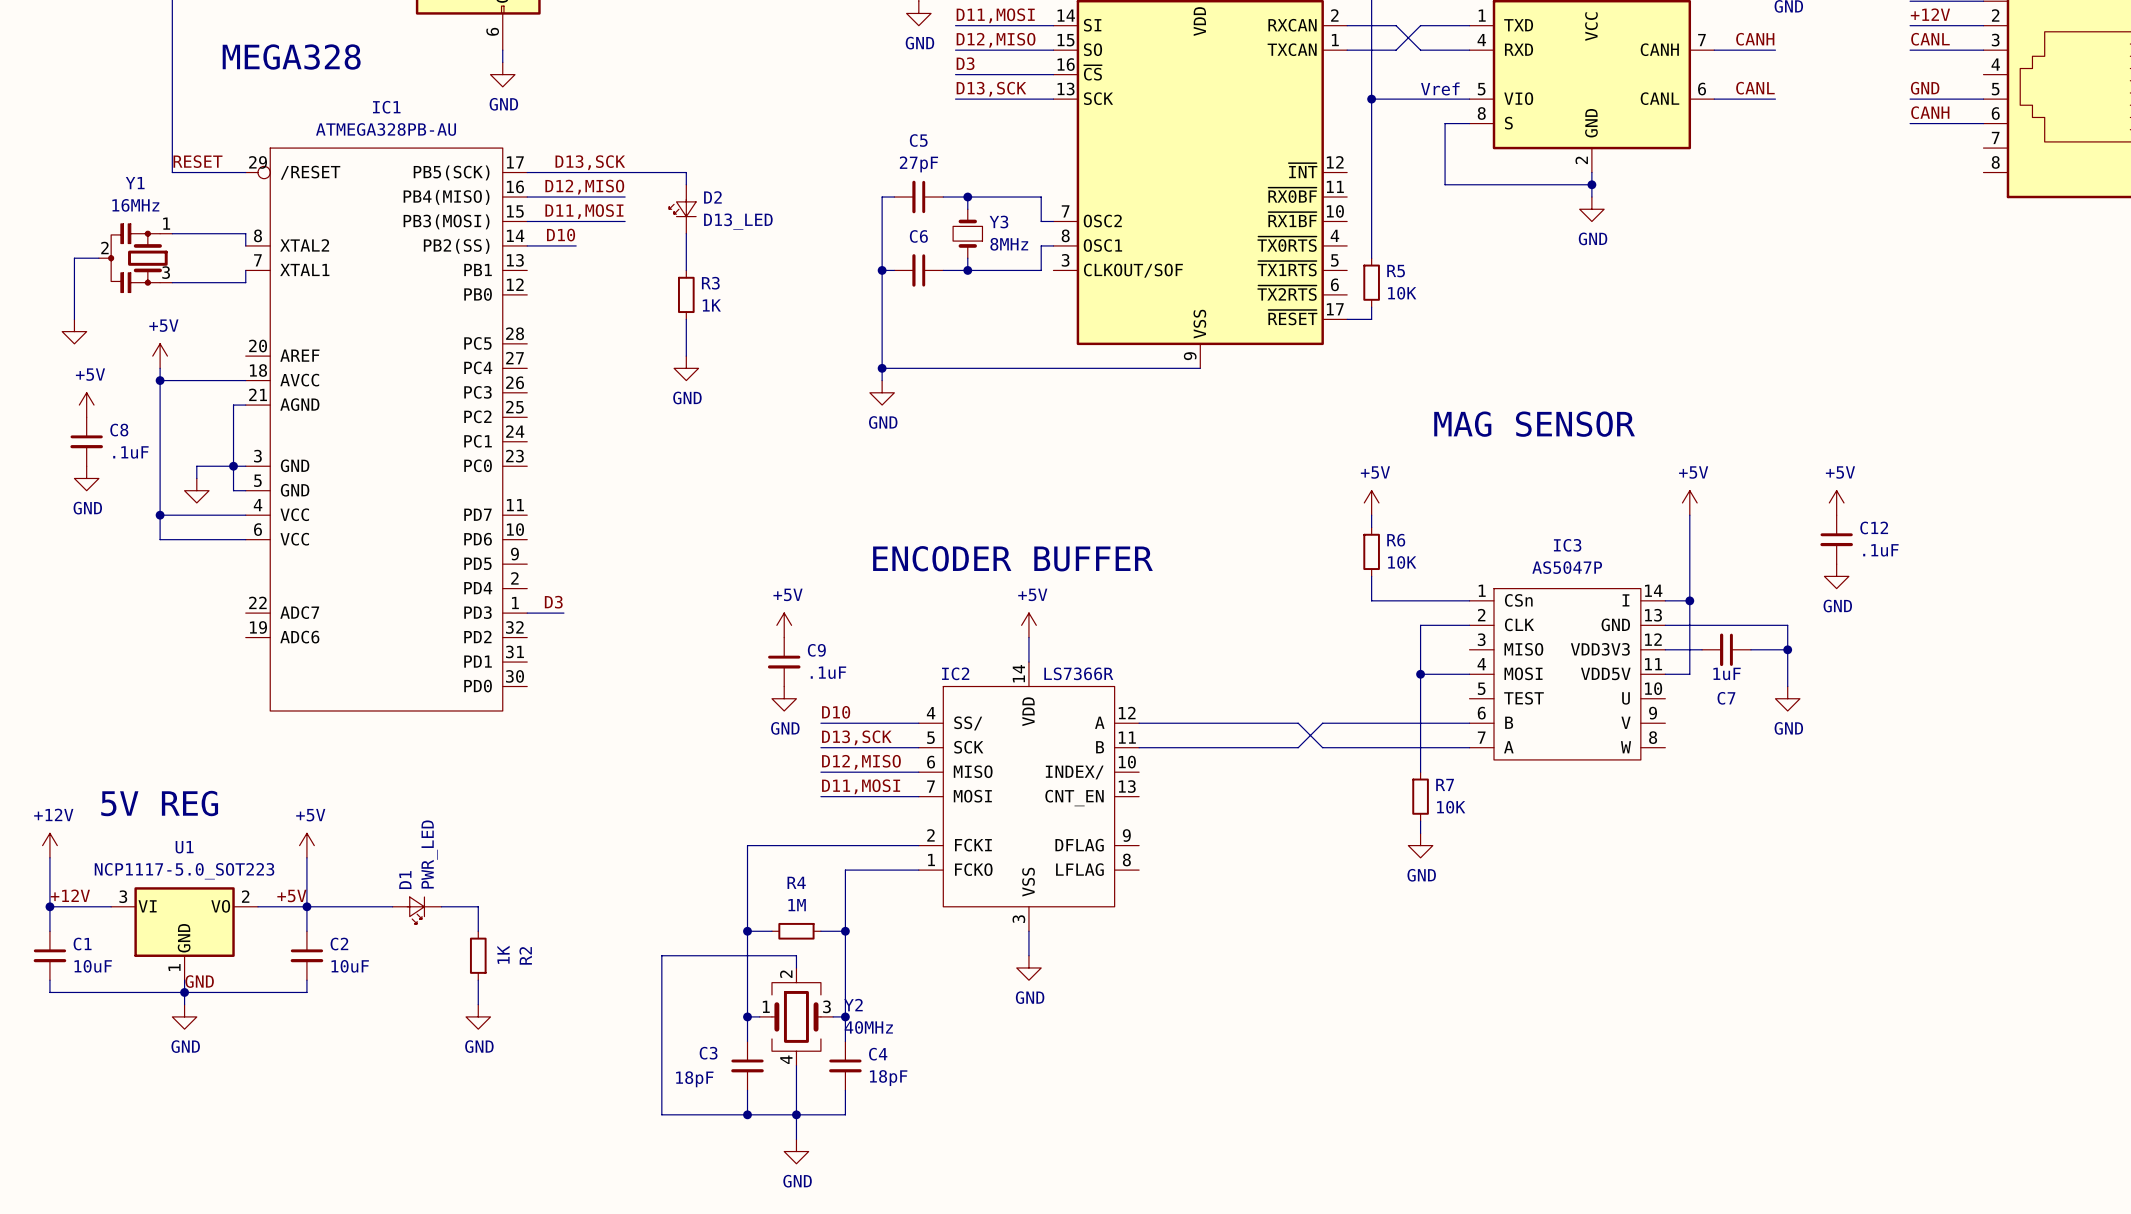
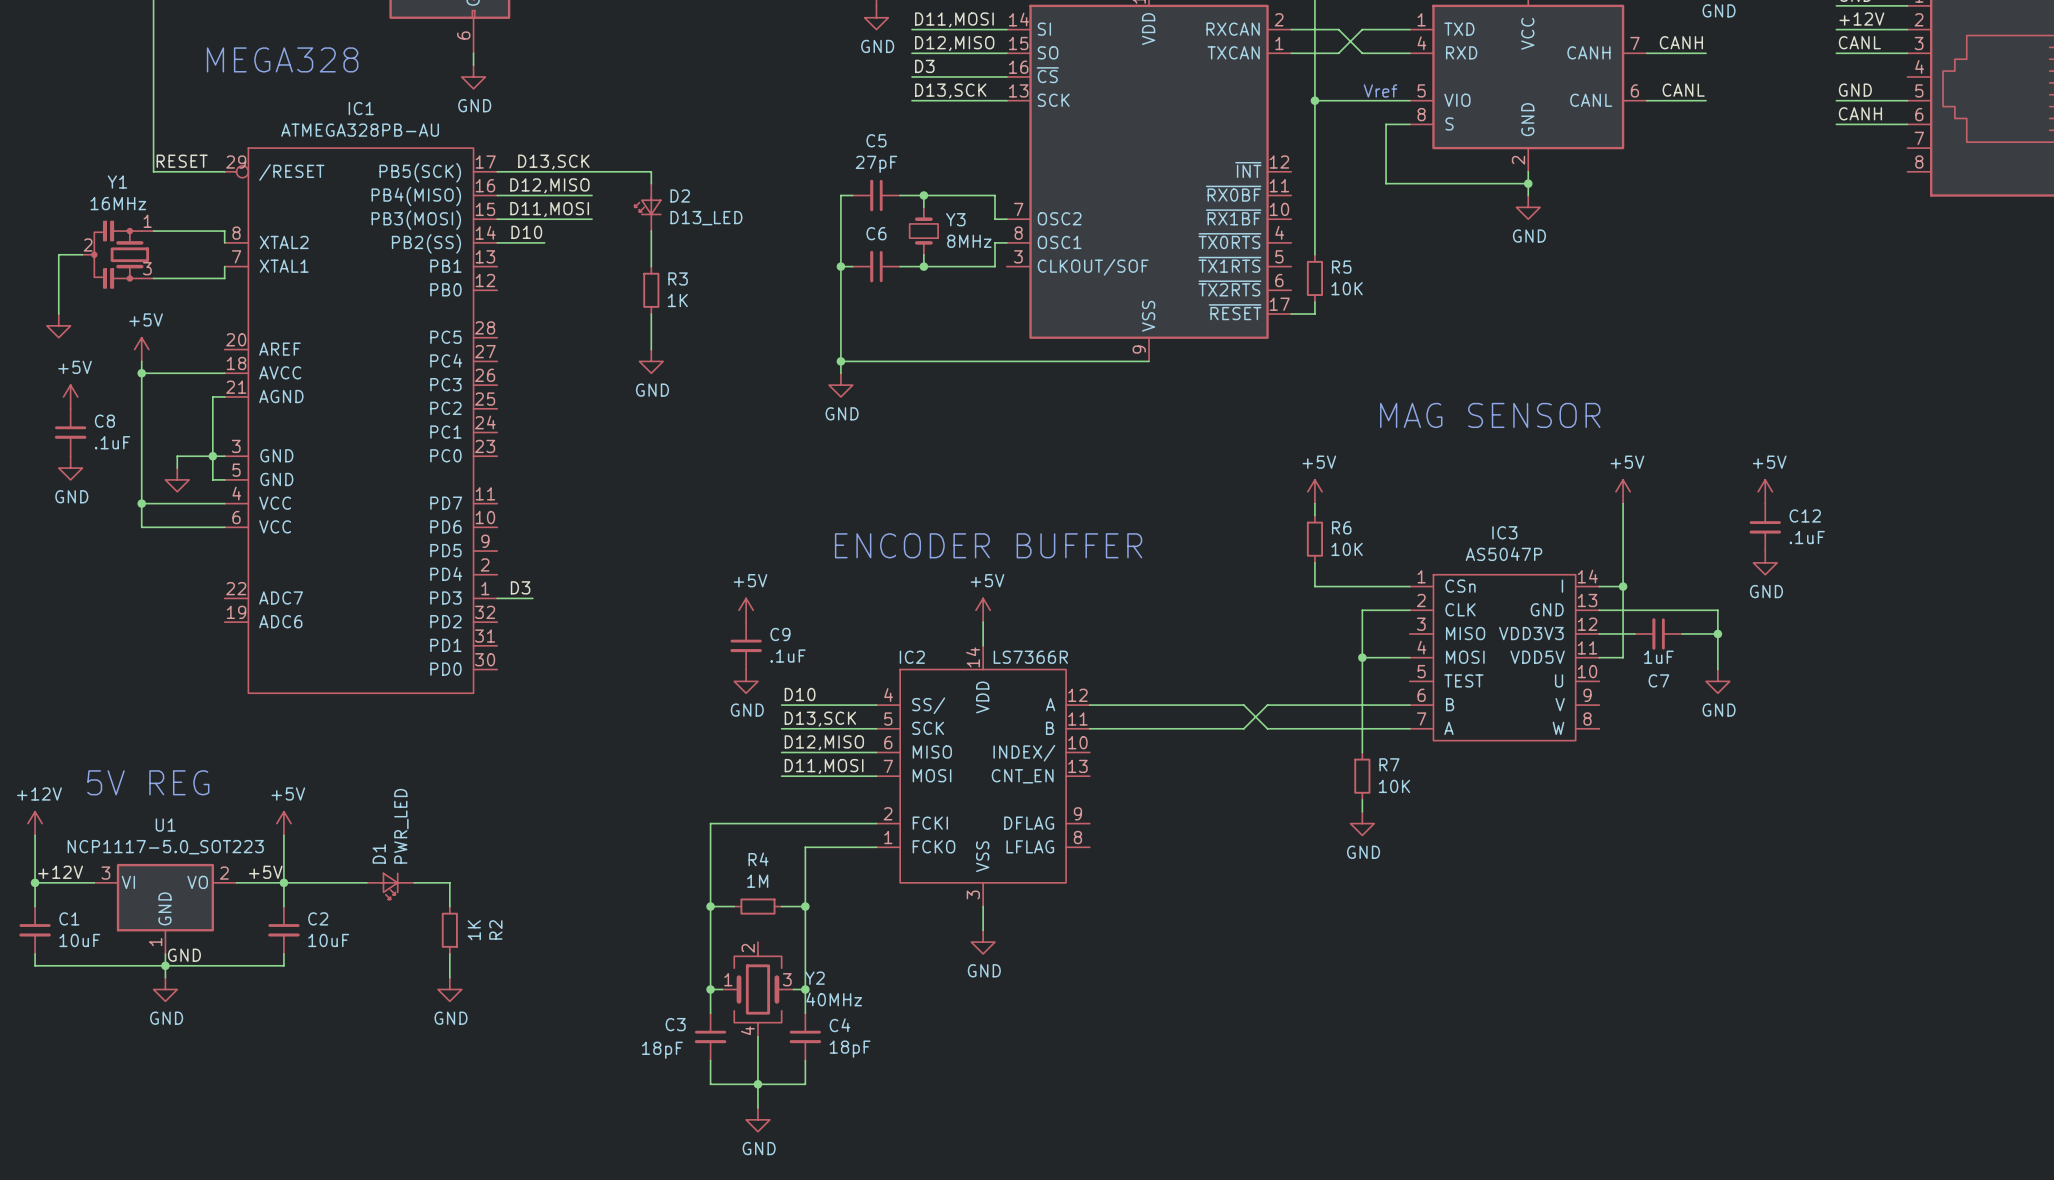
wire: (796, 967) (796, 955) (661, 955) (661, 1114) (747, 1114) -> none
junction: (747, 1114) -> none

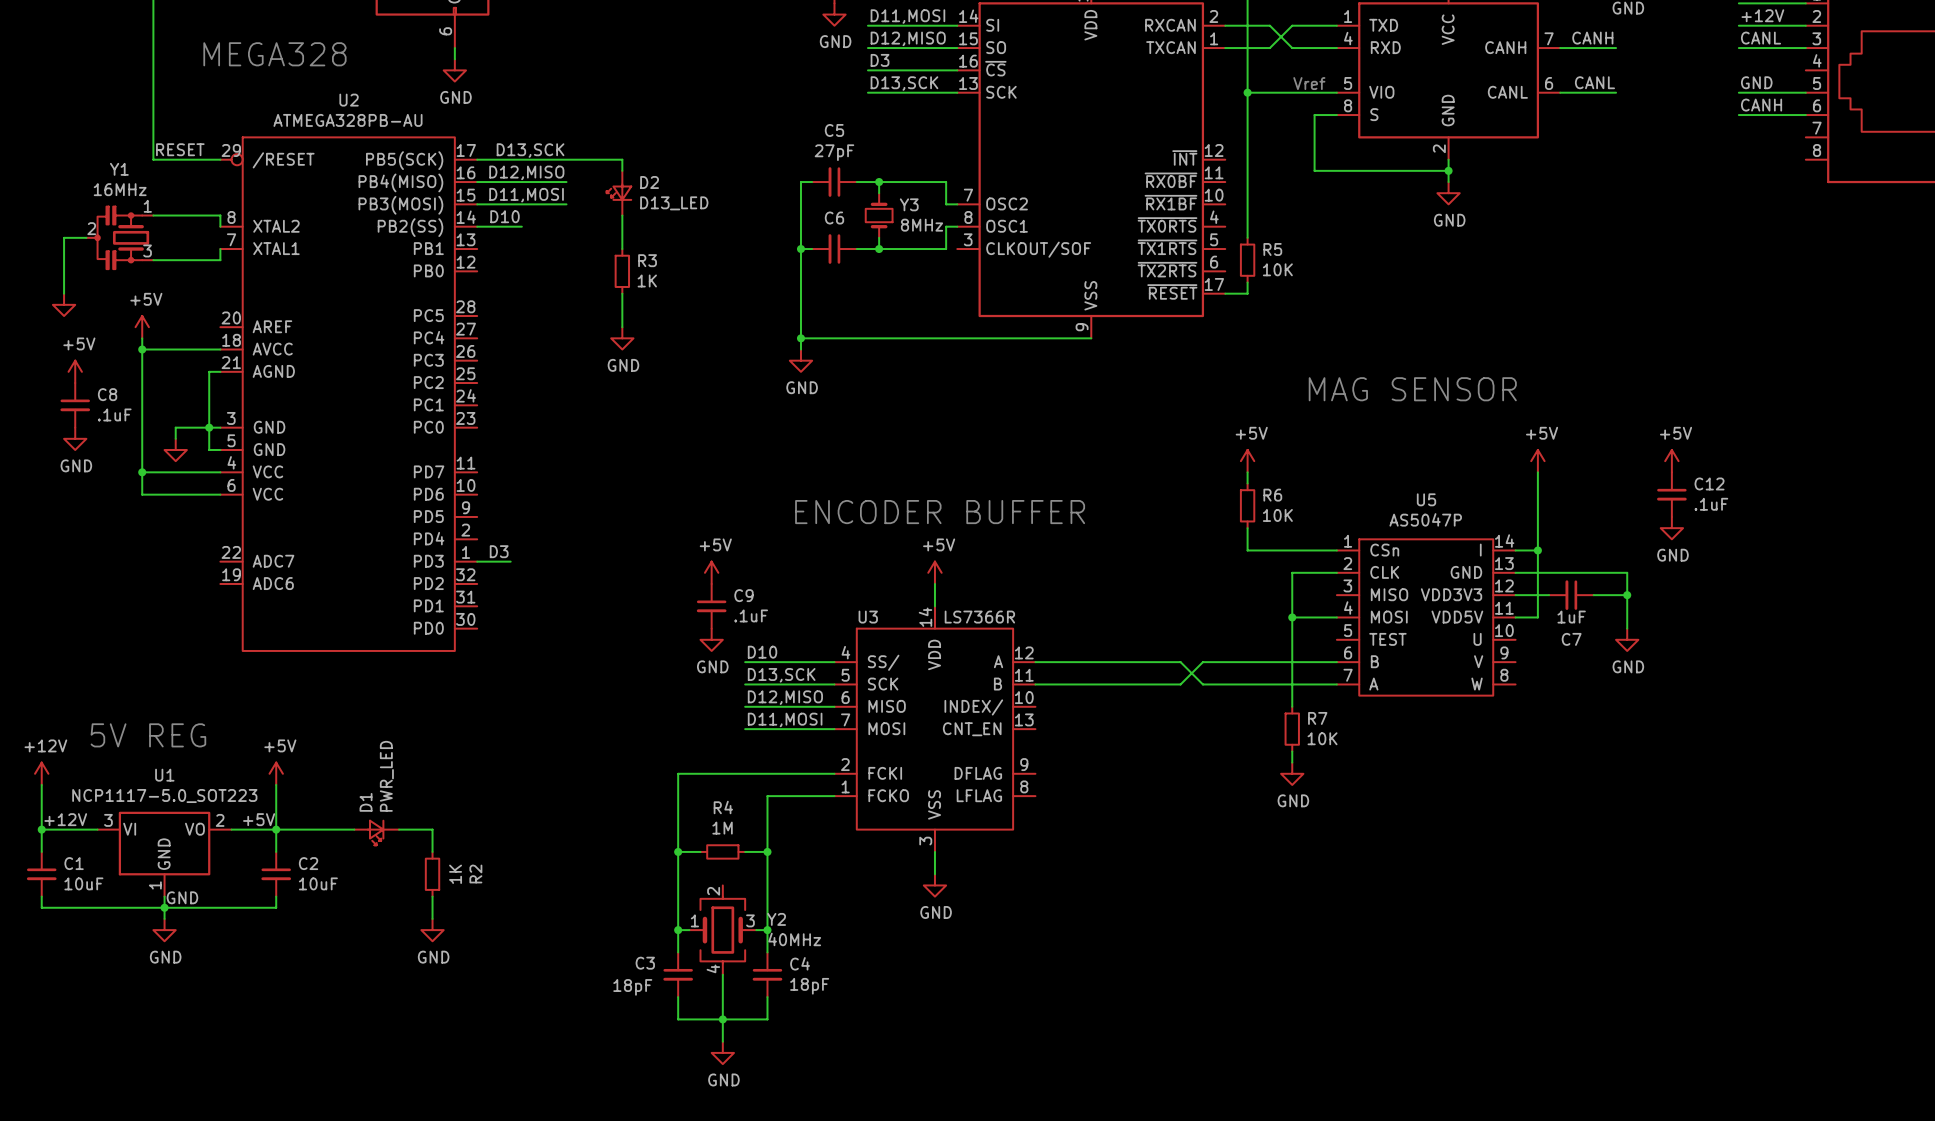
IC1 name: IC1 (361, 108) -> U2 (349, 100)
IC3 name: IC3 (1504, 532) -> U5 (1426, 499)
IC2 name: IC2 (912, 657) -> U3 (868, 617)

